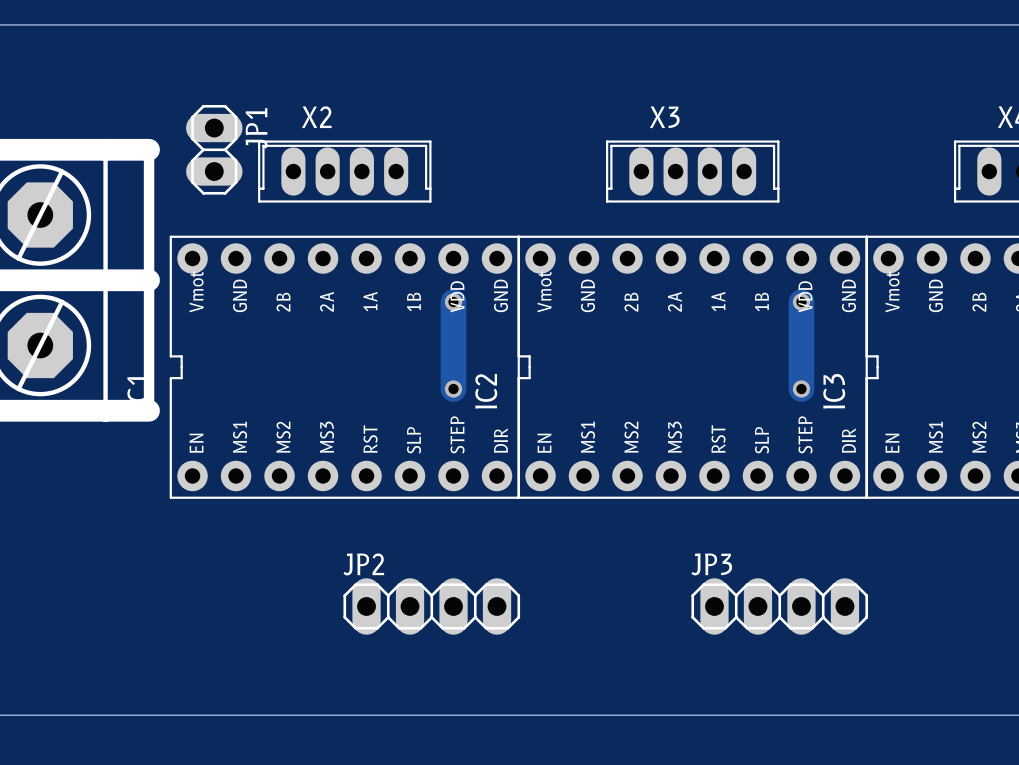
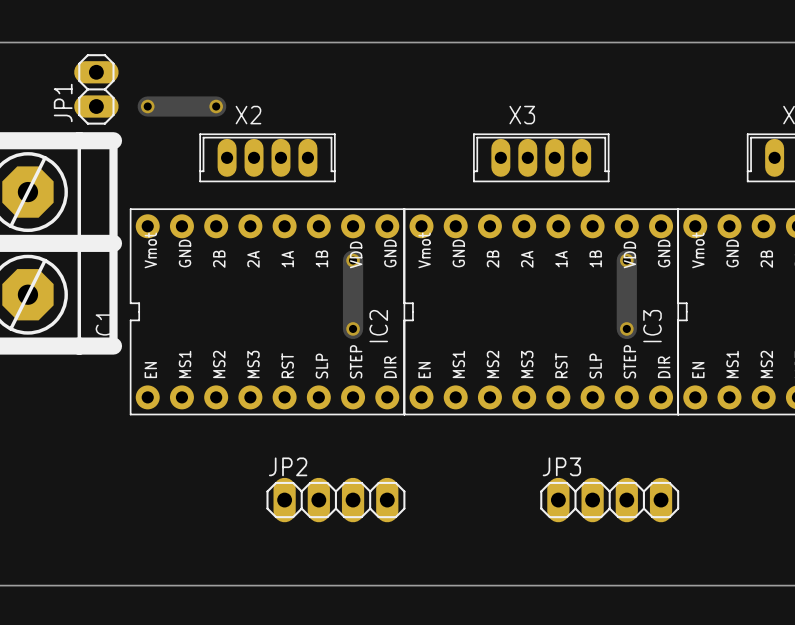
track: none -> (147, 106) (216, 106)
via: none -> (147, 106)
via: none -> (216, 106)
JP1 name position: JP1 (256, 128) -> JP1 (63, 102)
JP1 position: (214, 149) -> (96, 89)

